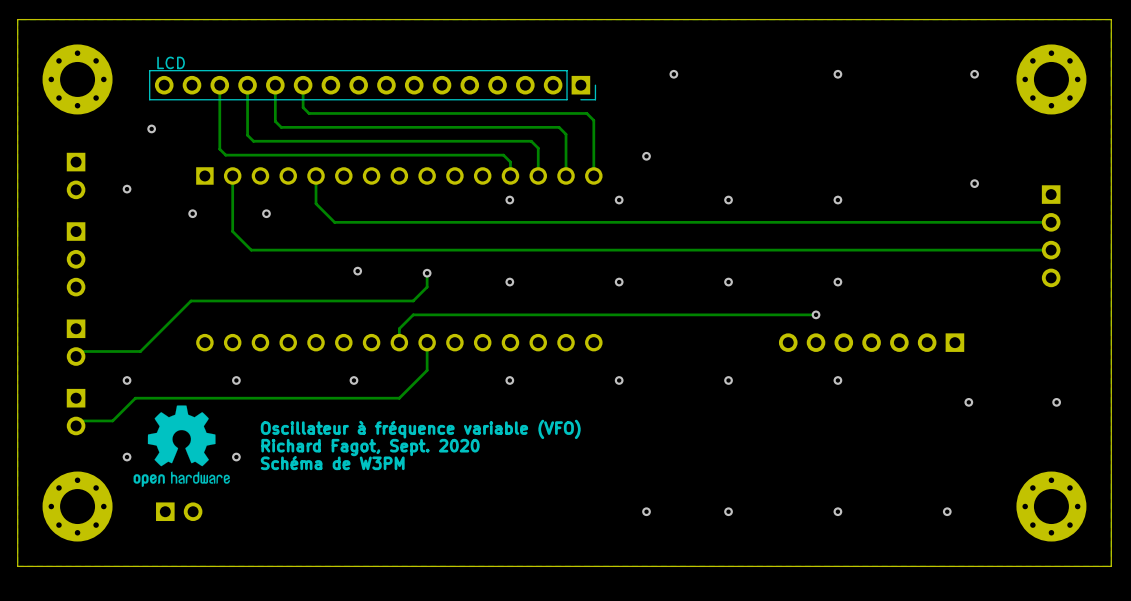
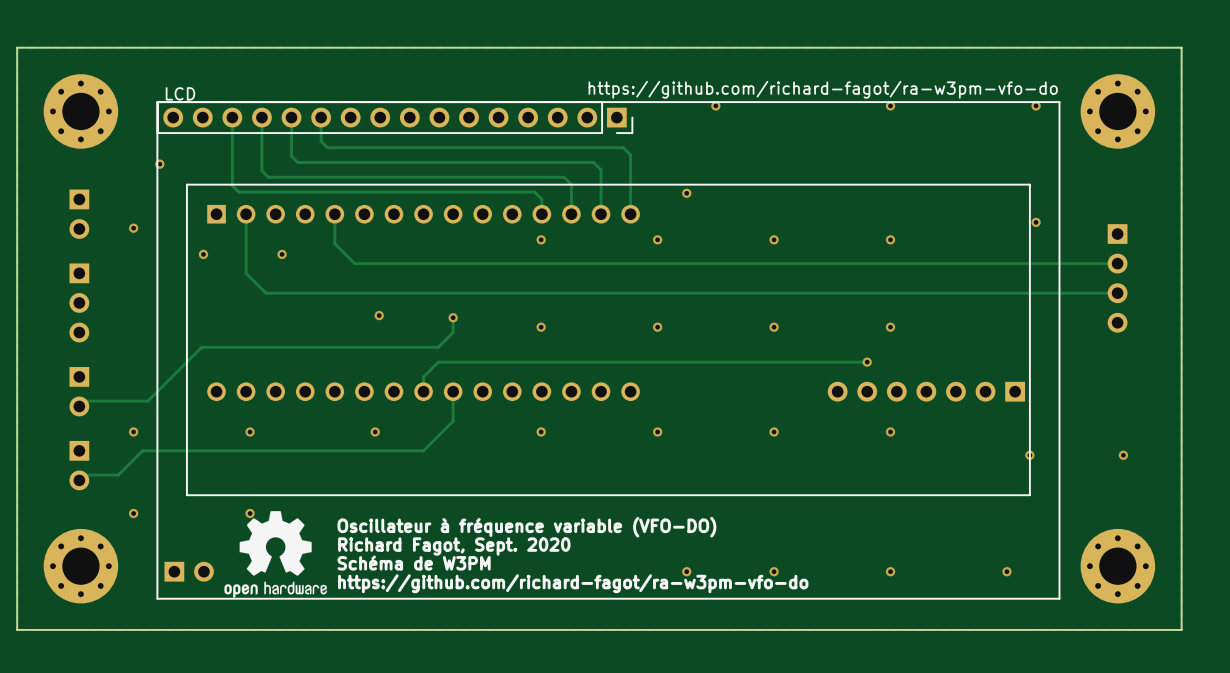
text: none -> https://github.com/richard-fagot/ra-w3pm-vfo-do (823, 89)
line: none -> (157, 102) (1059, 102) (1059, 598) (157, 598) (157, 102)
line: none -> (1029, 184) (1029, 495) (186, 495) (186, 184) (1029, 184)
text: Oscillateur à fréquence variable (VFO) (420, 429) -> none
drawing position: (181, 446) -> (275, 554)
text position: Richard Fagot, Sept. 2020 (370, 447) -> Richard Fagot, Sept. 2020 (454, 546)
text position: Schéma de W3PM (332, 463) -> Schéma de W3PM (414, 563)
text: none -> Oscillateur à fréquence variable (VFO-DO) (526, 527)
text: none -> https://github.com/richard-fagot/ra-w3pm-vfo-do (573, 583)

